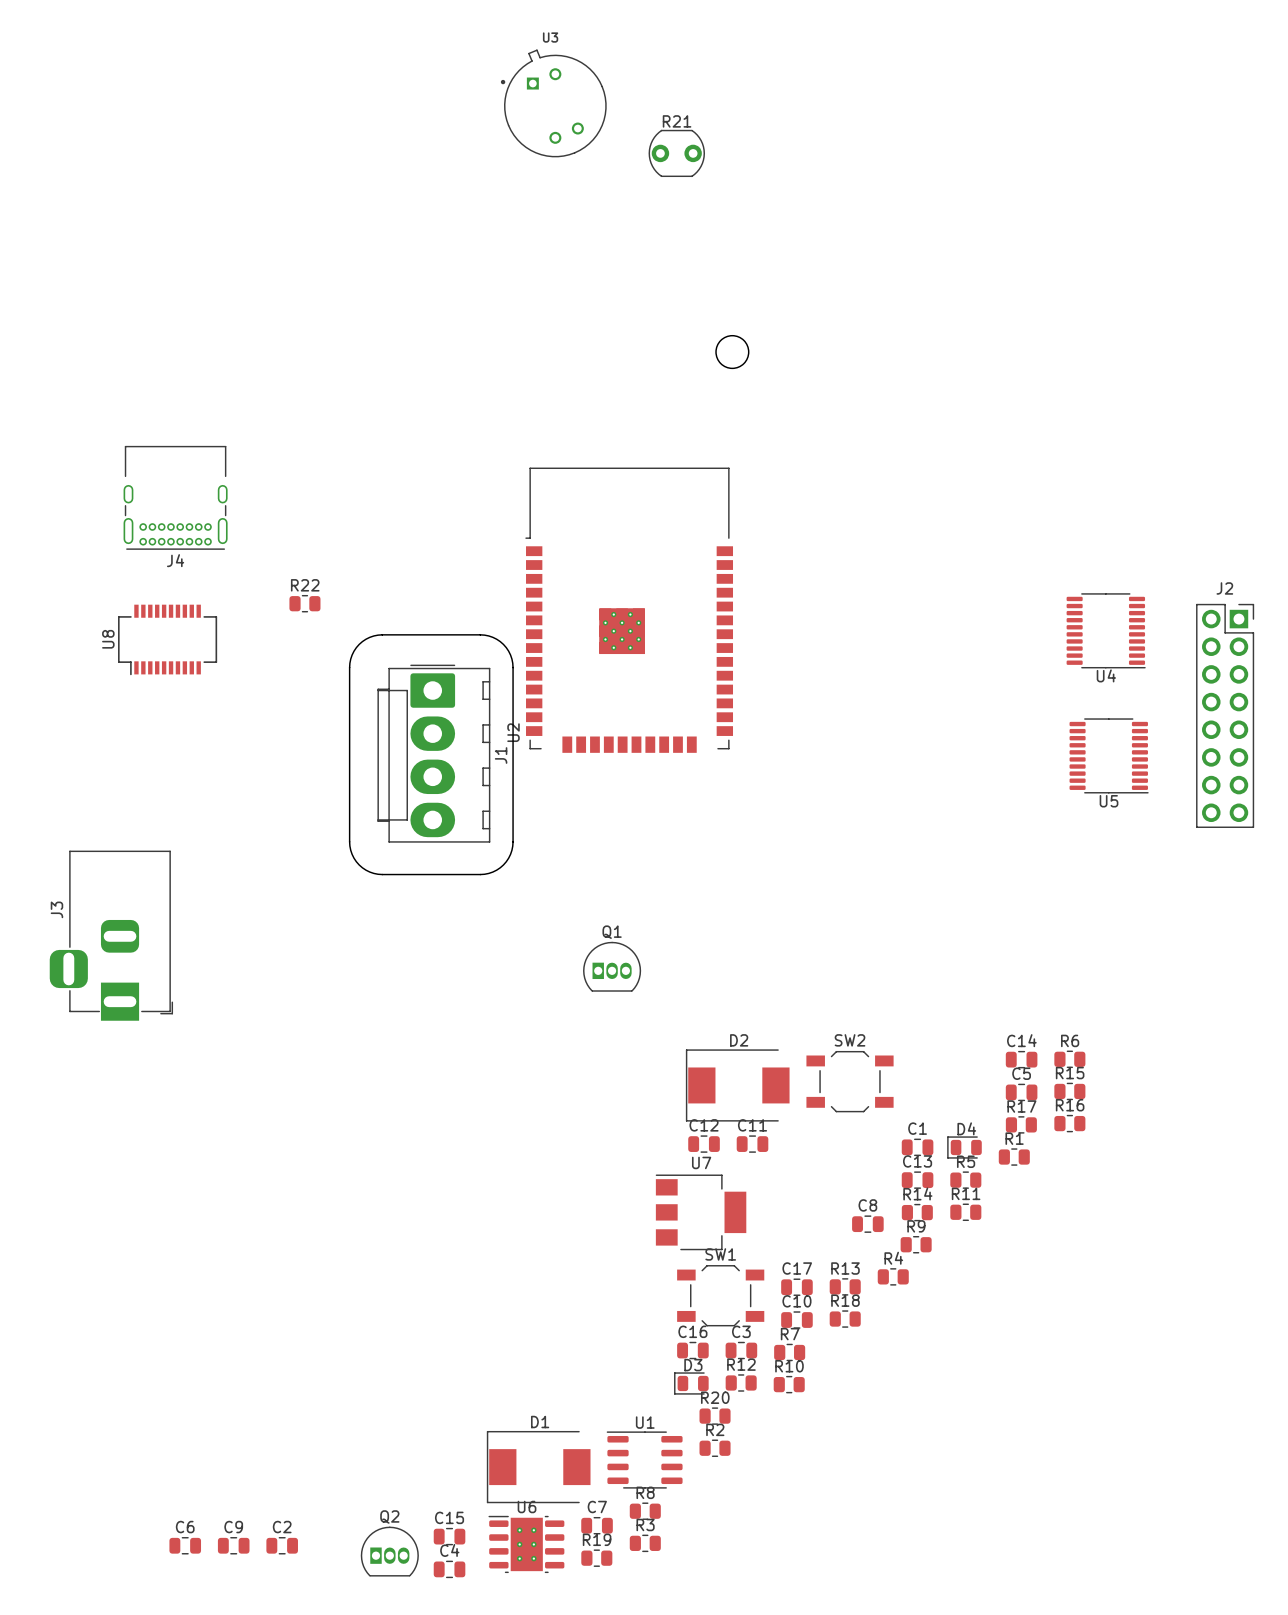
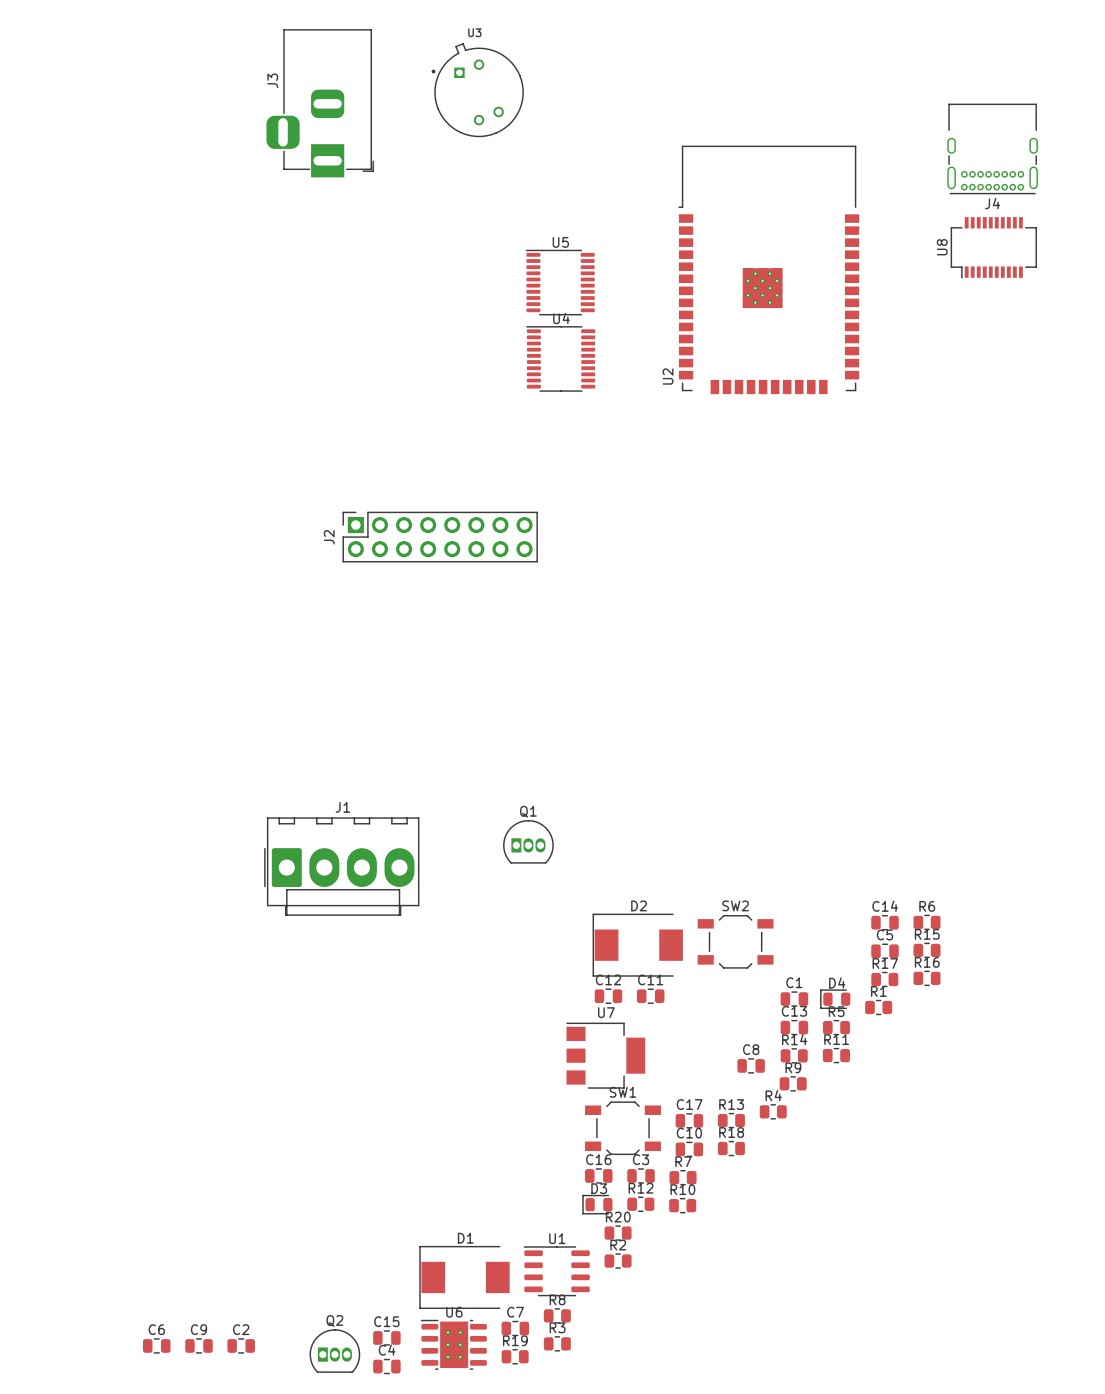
R21: (676, 153) -> none
round board edge: [715, 335, 750, 369] -> none
J4 position: (175, 497) -> (992, 148)
R22: (304, 603) -> none
U2 position: (629, 610) -> (768, 269)
U4 rotation: 0° (1106, 630) -> 180° (560, 358)
U4 position: (1106, 630) -> (560, 358)
board edge: (382, 634) (484, 635) (500, 641) (510, 655) (513, 667) (512, 846) (506, 861) (492, 872) (480, 874) (378, 874) (362, 867) (352, 854) (349, 841) (349, 663) (354, 651) (362, 641) (373, 635) (382, 634) -> none
U8 position: (167, 639) -> (993, 247)
J2 rotation: 0° (1225, 715) -> 90° counterclockwise (440, 537)
J2 position: (1225, 715) -> (440, 537)
J1 rotation: 0° (433, 753) -> 90° counterclockwise (341, 866)
J1 position: (433, 753) -> (341, 866)
U5 rotation: 0° (1109, 755) -> 180° (560, 282)
U5 position: (1109, 755) -> (560, 282)
J3 position: (111, 935) -> (320, 103)

